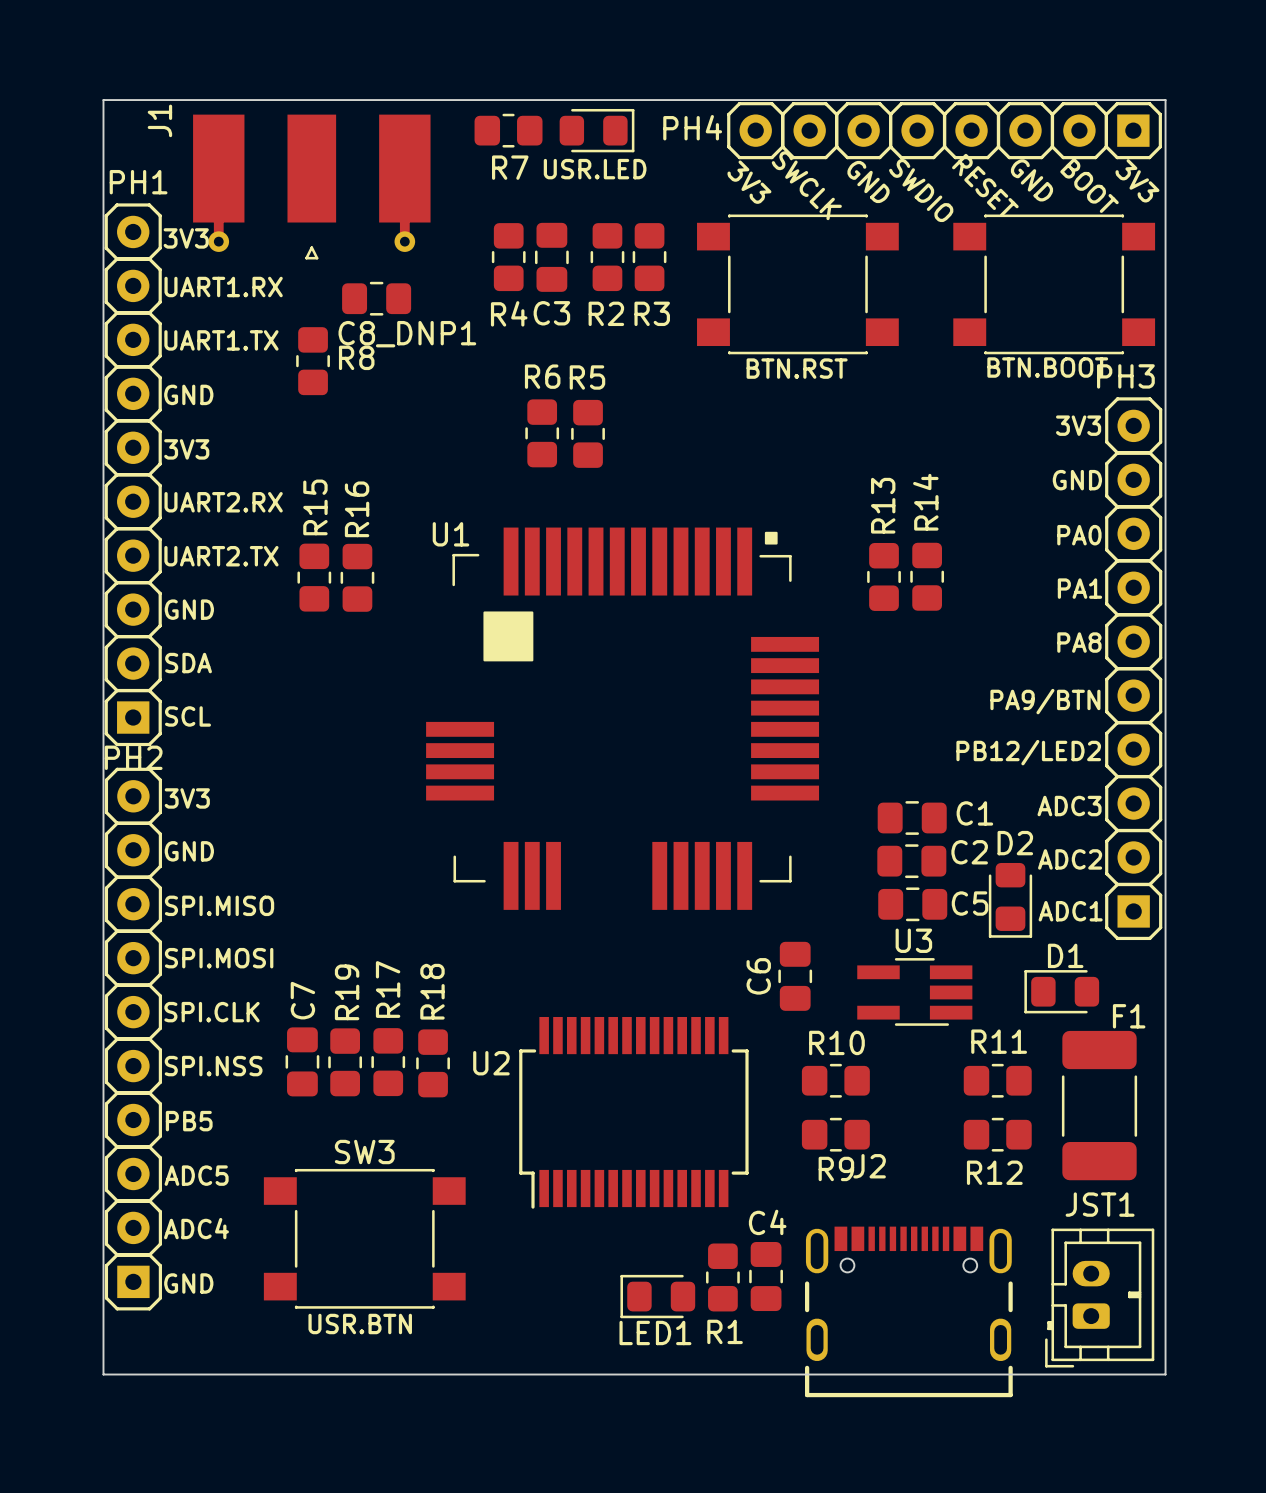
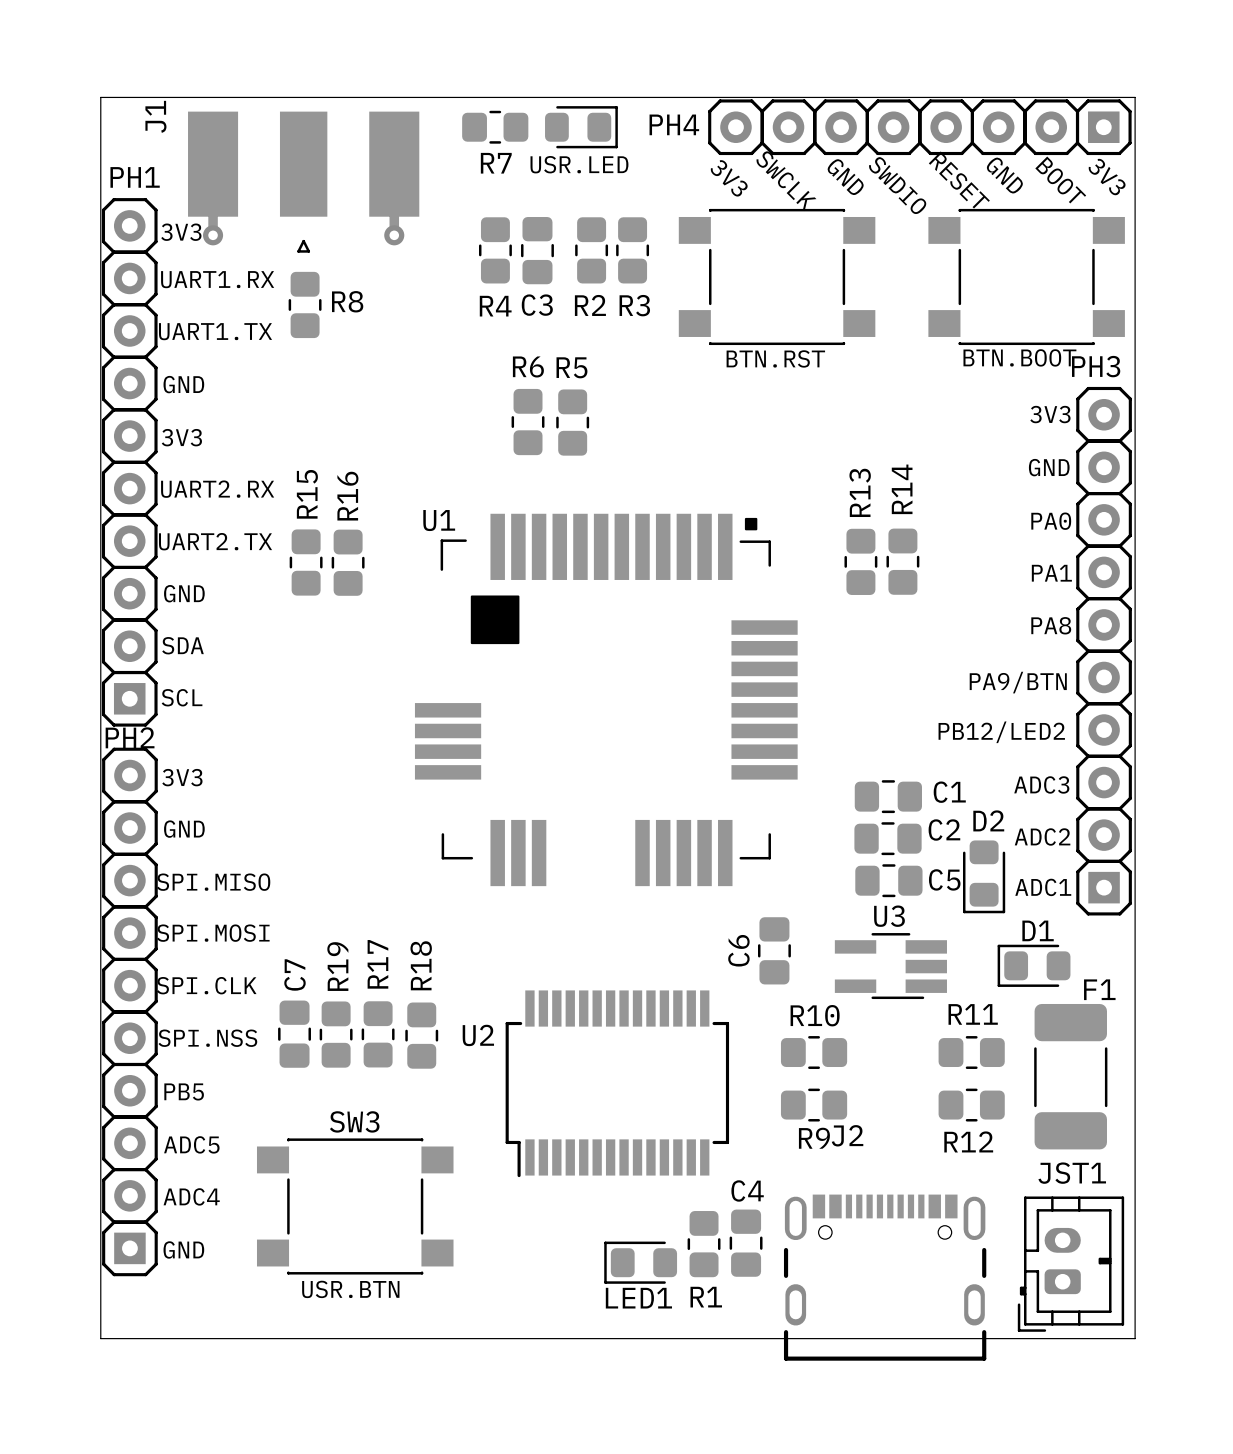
C8_DNP1: (376, 298) -> none
R8 position: (313, 361) -> (305, 304)

